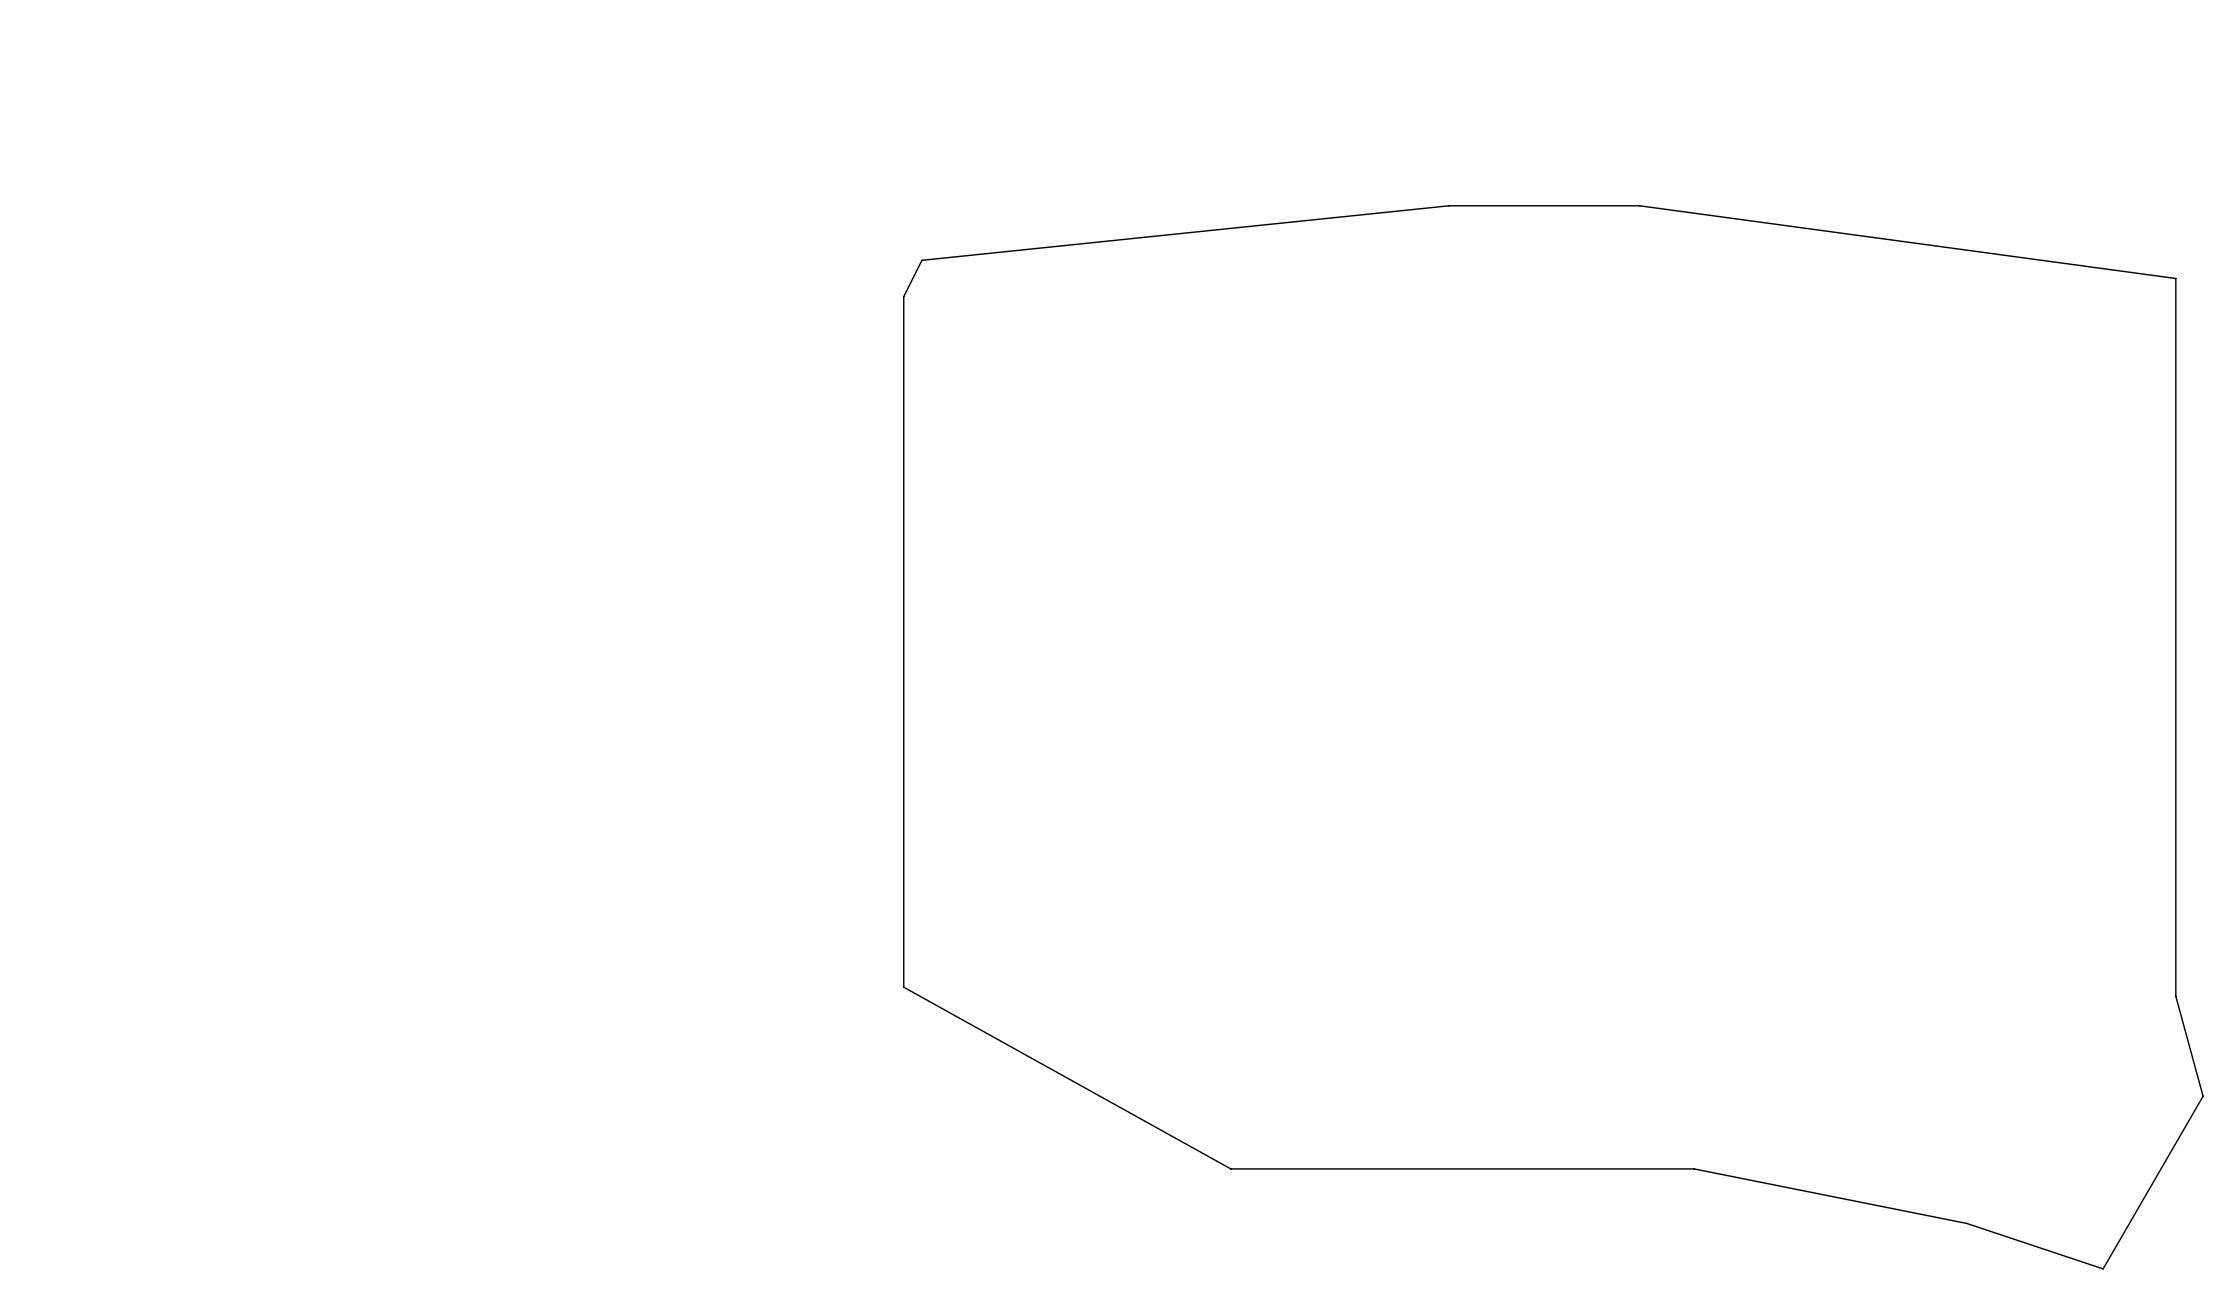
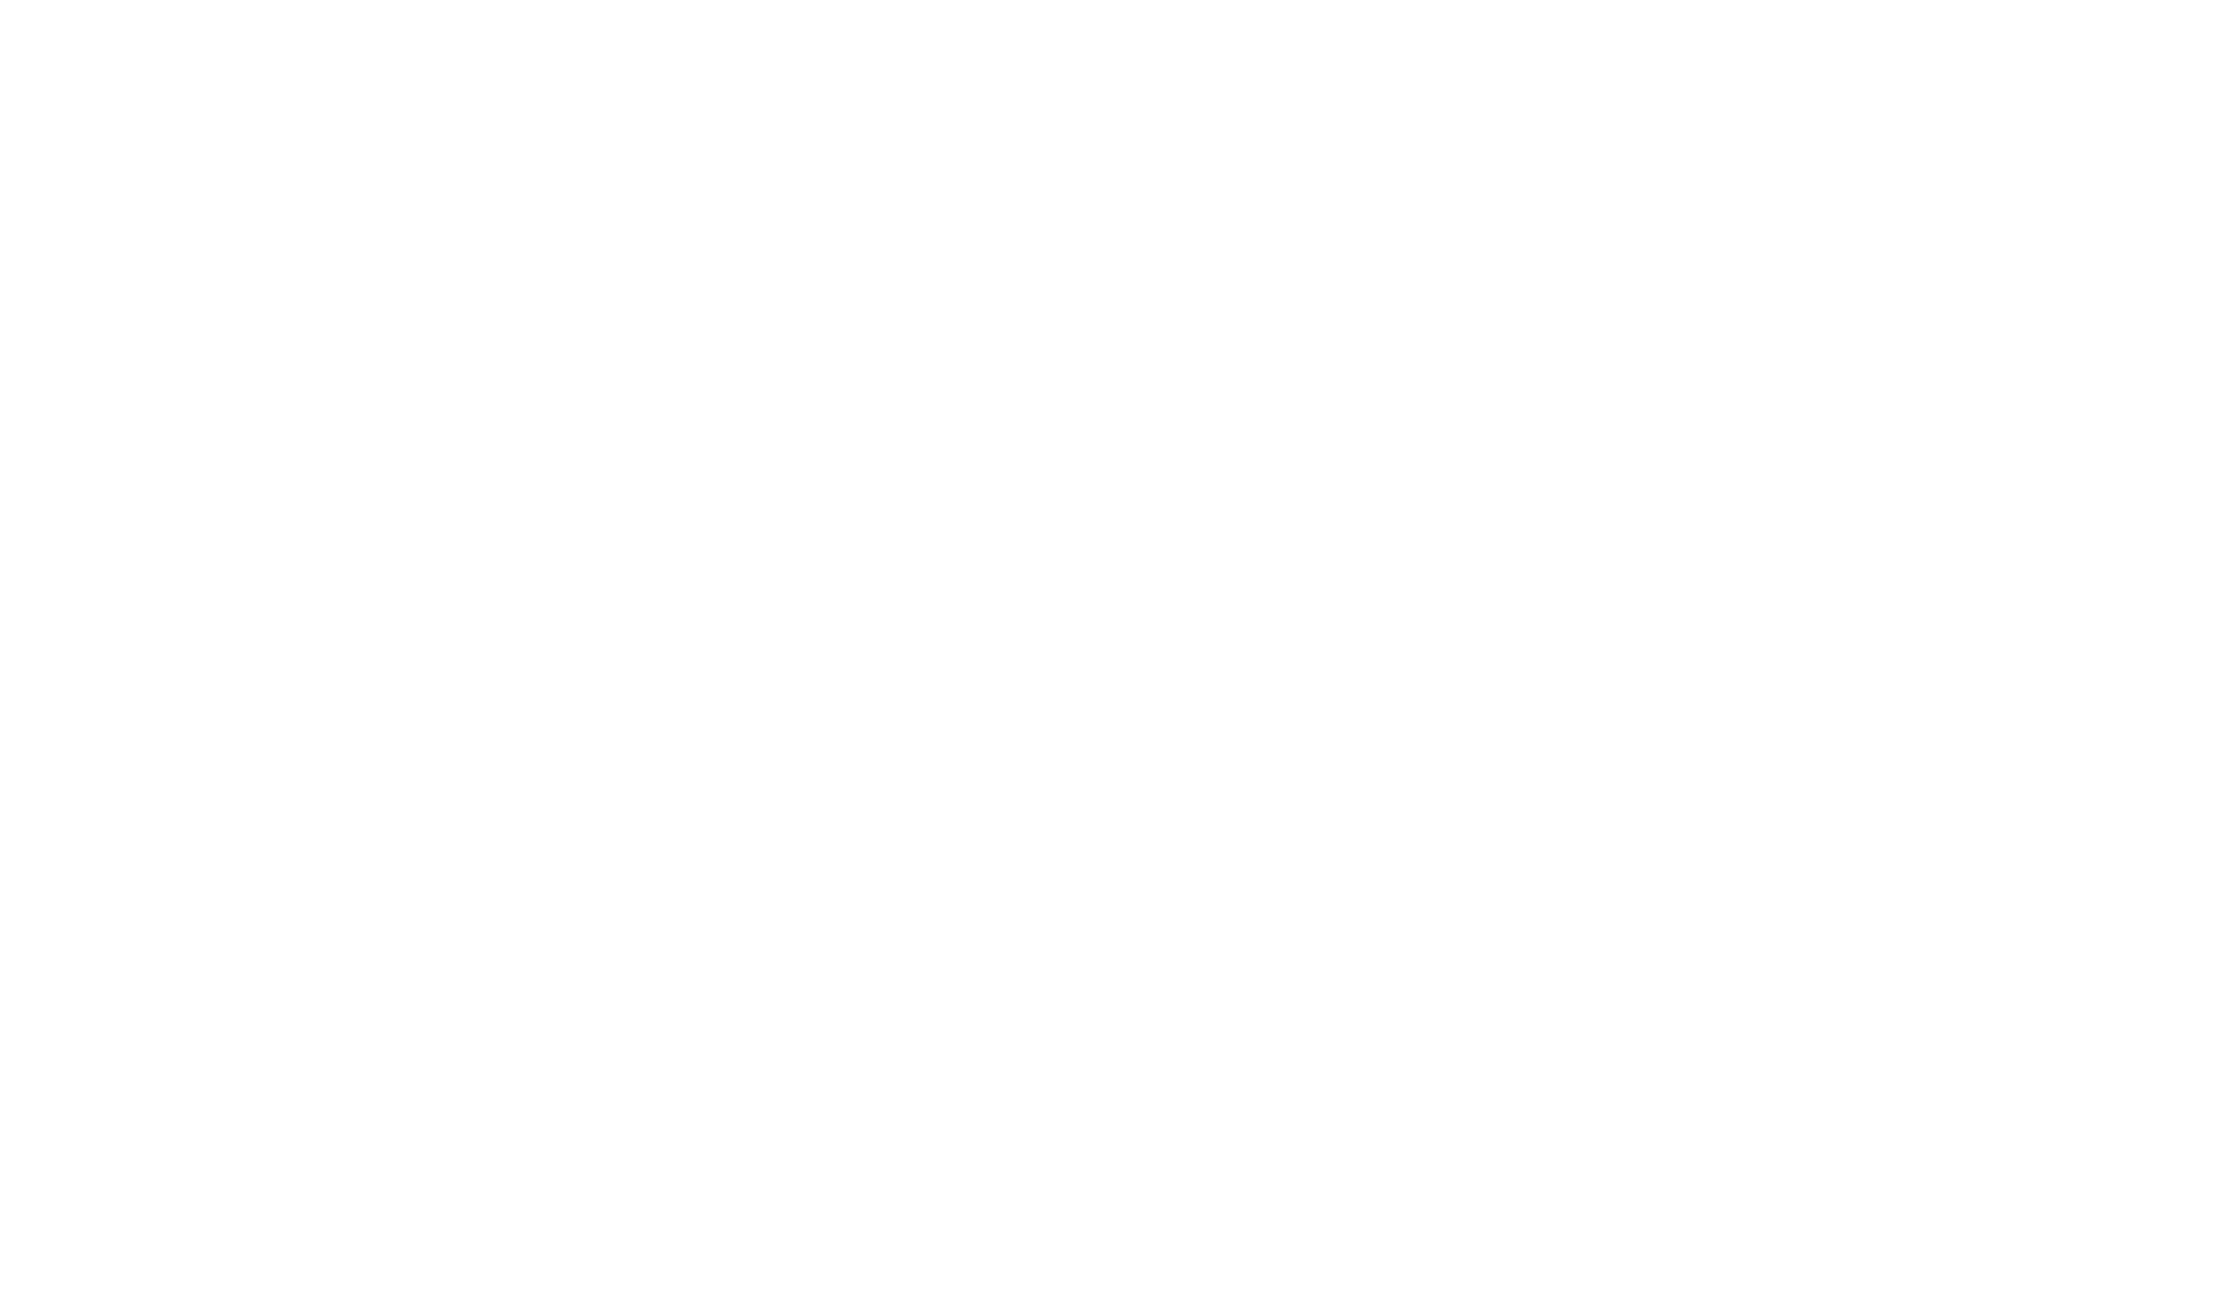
board edge: (1448, 205) (921, 260) (903, 296) (903, 987) (1230, 1168) (1694, 1168) (1966, 1223) (2103, 1268) (2203, 1096) (2175, 996) (2175, 278) (1639, 205) (1448, 205) -> none

